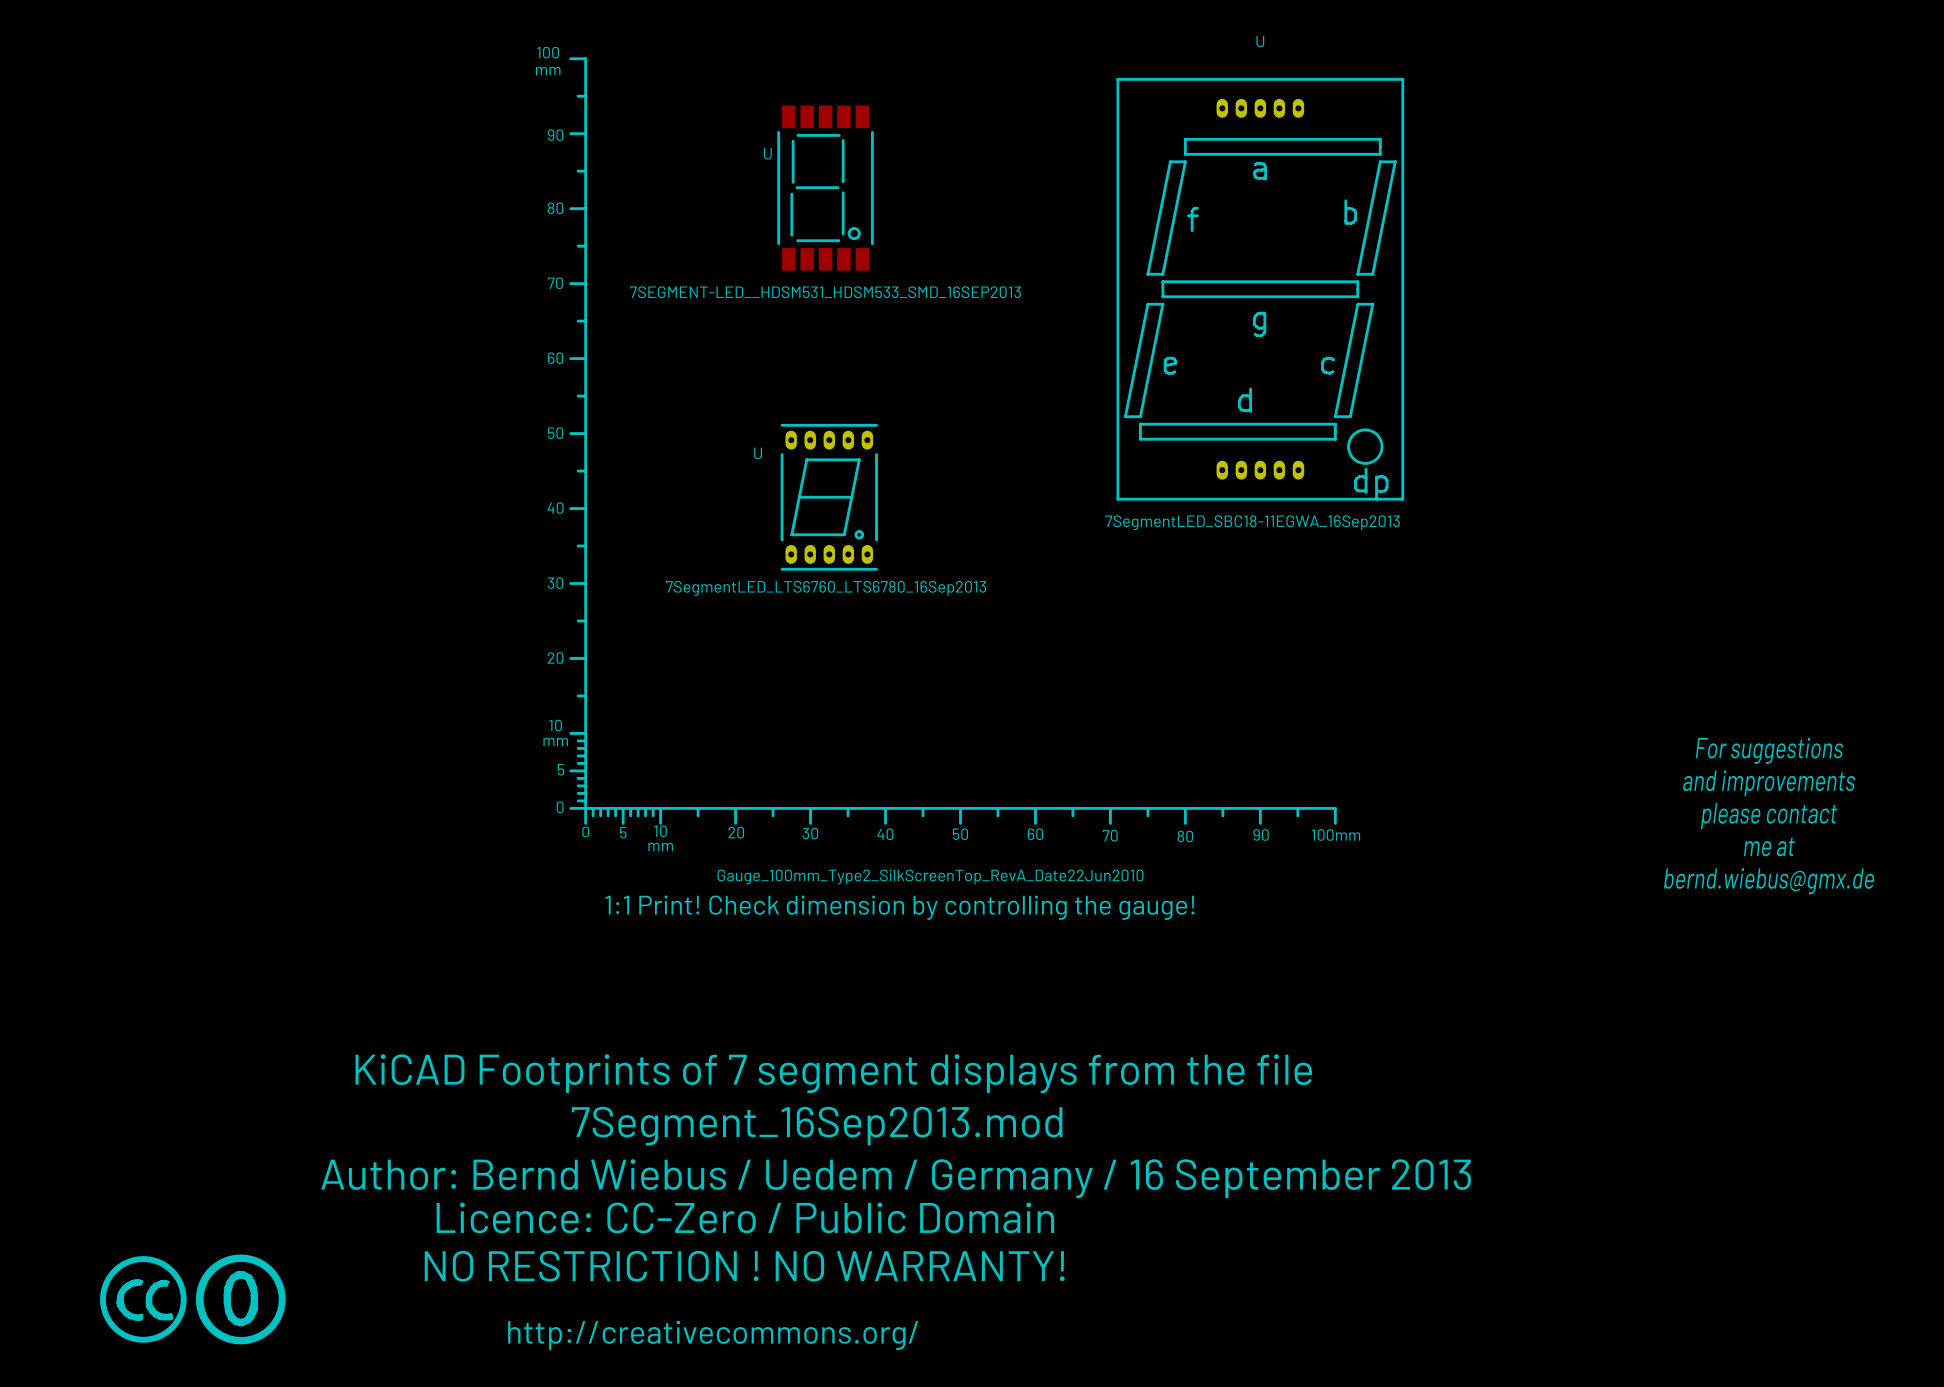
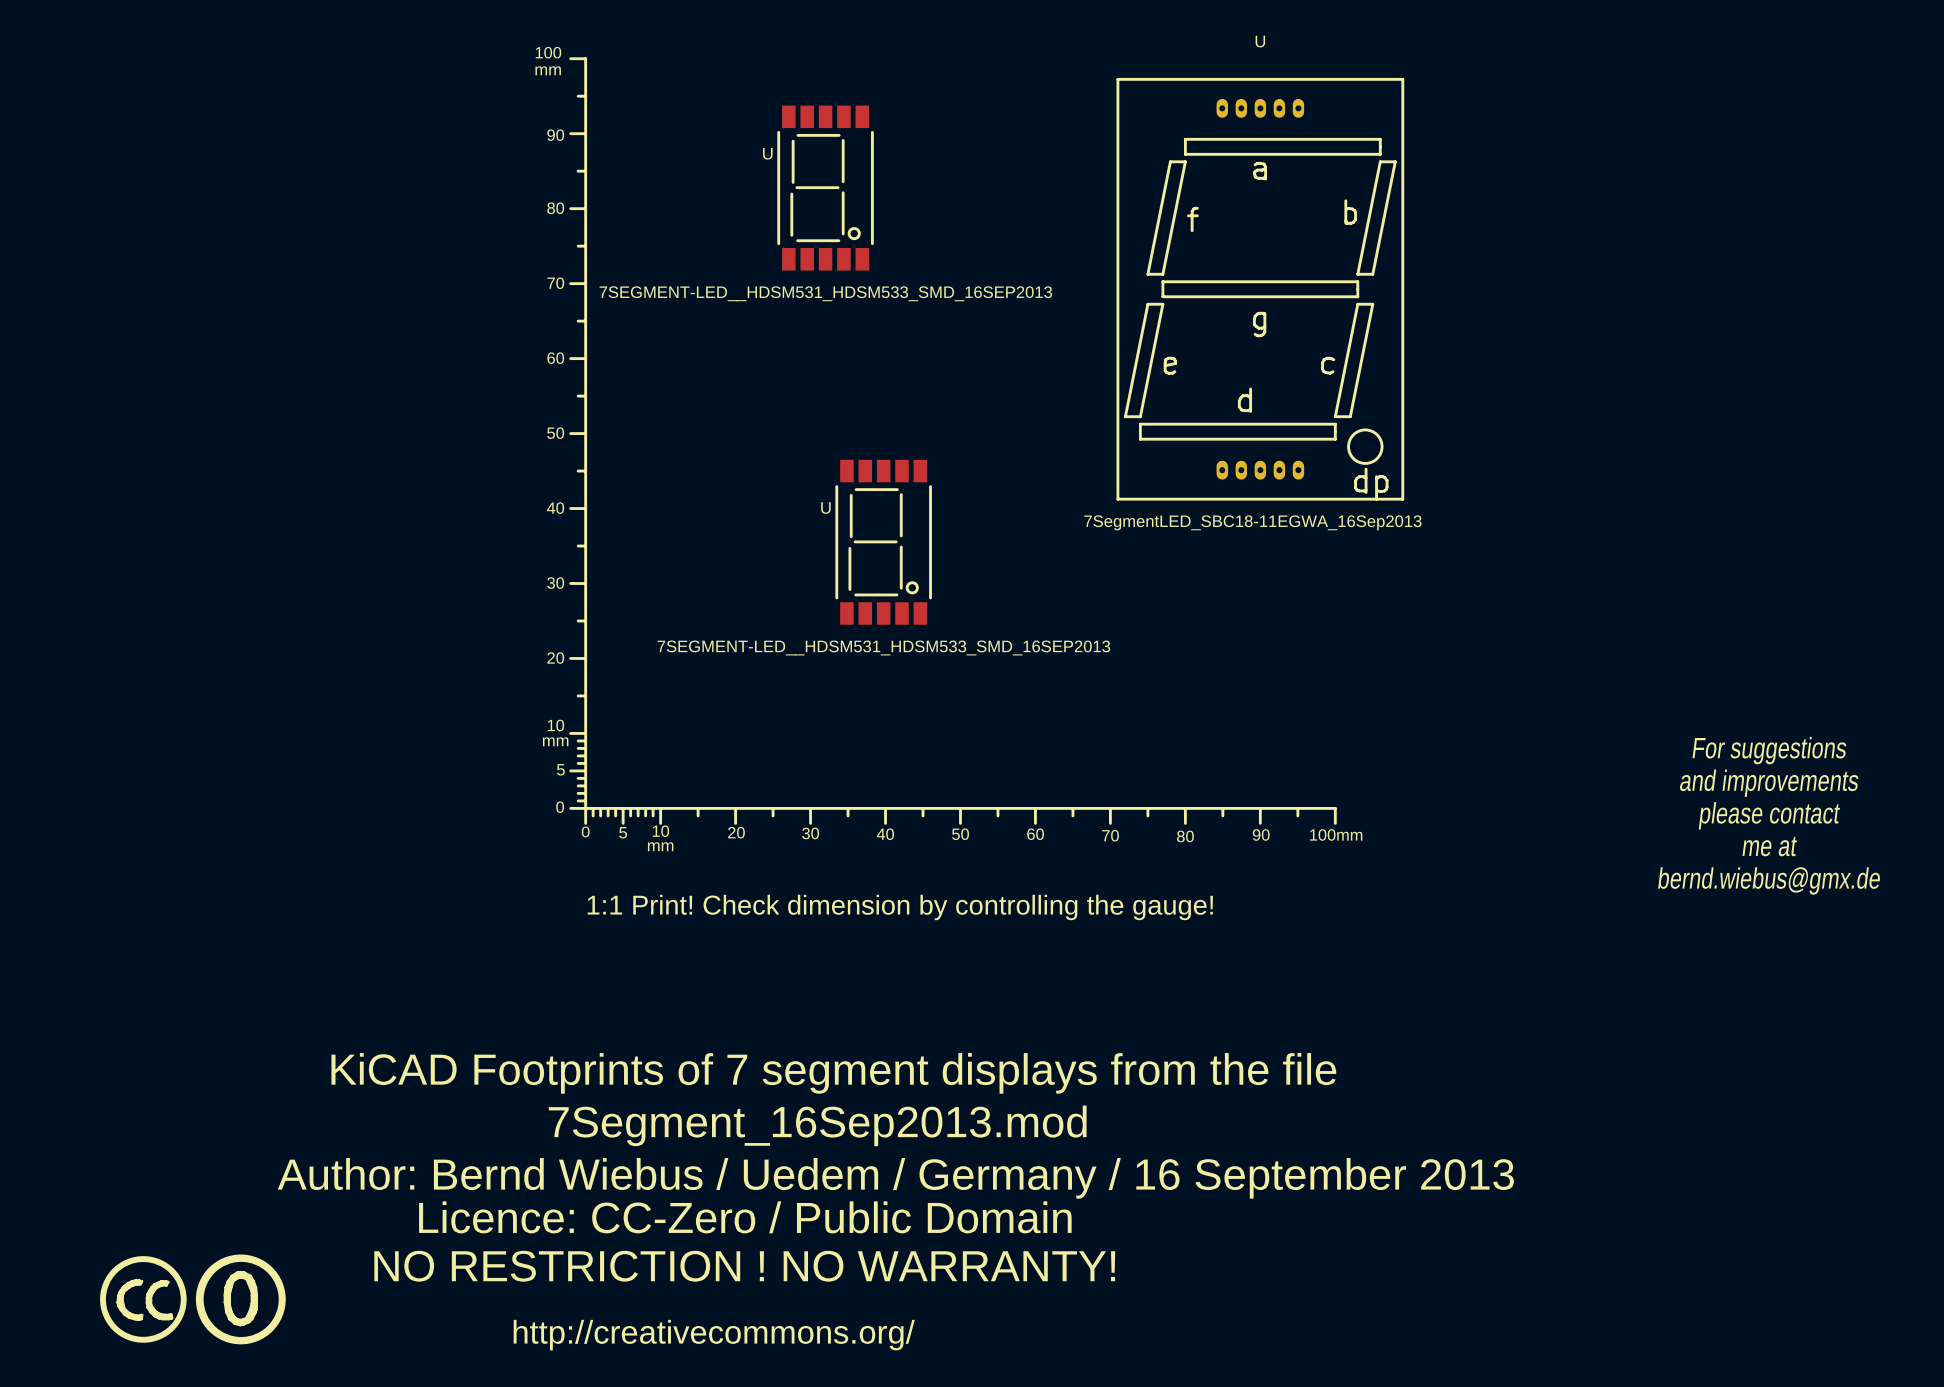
drawing shape: [535, 46, 1361, 885] -> [535, 46, 1363, 852]
U: 7SegmentLED_LTS6760_LTS6780_16Sep2013 (829, 497) -> none
U: none -> 7SEGMENT-LED__HDSM531_HDSM533_SMD_16SEP2013 (883, 542)

